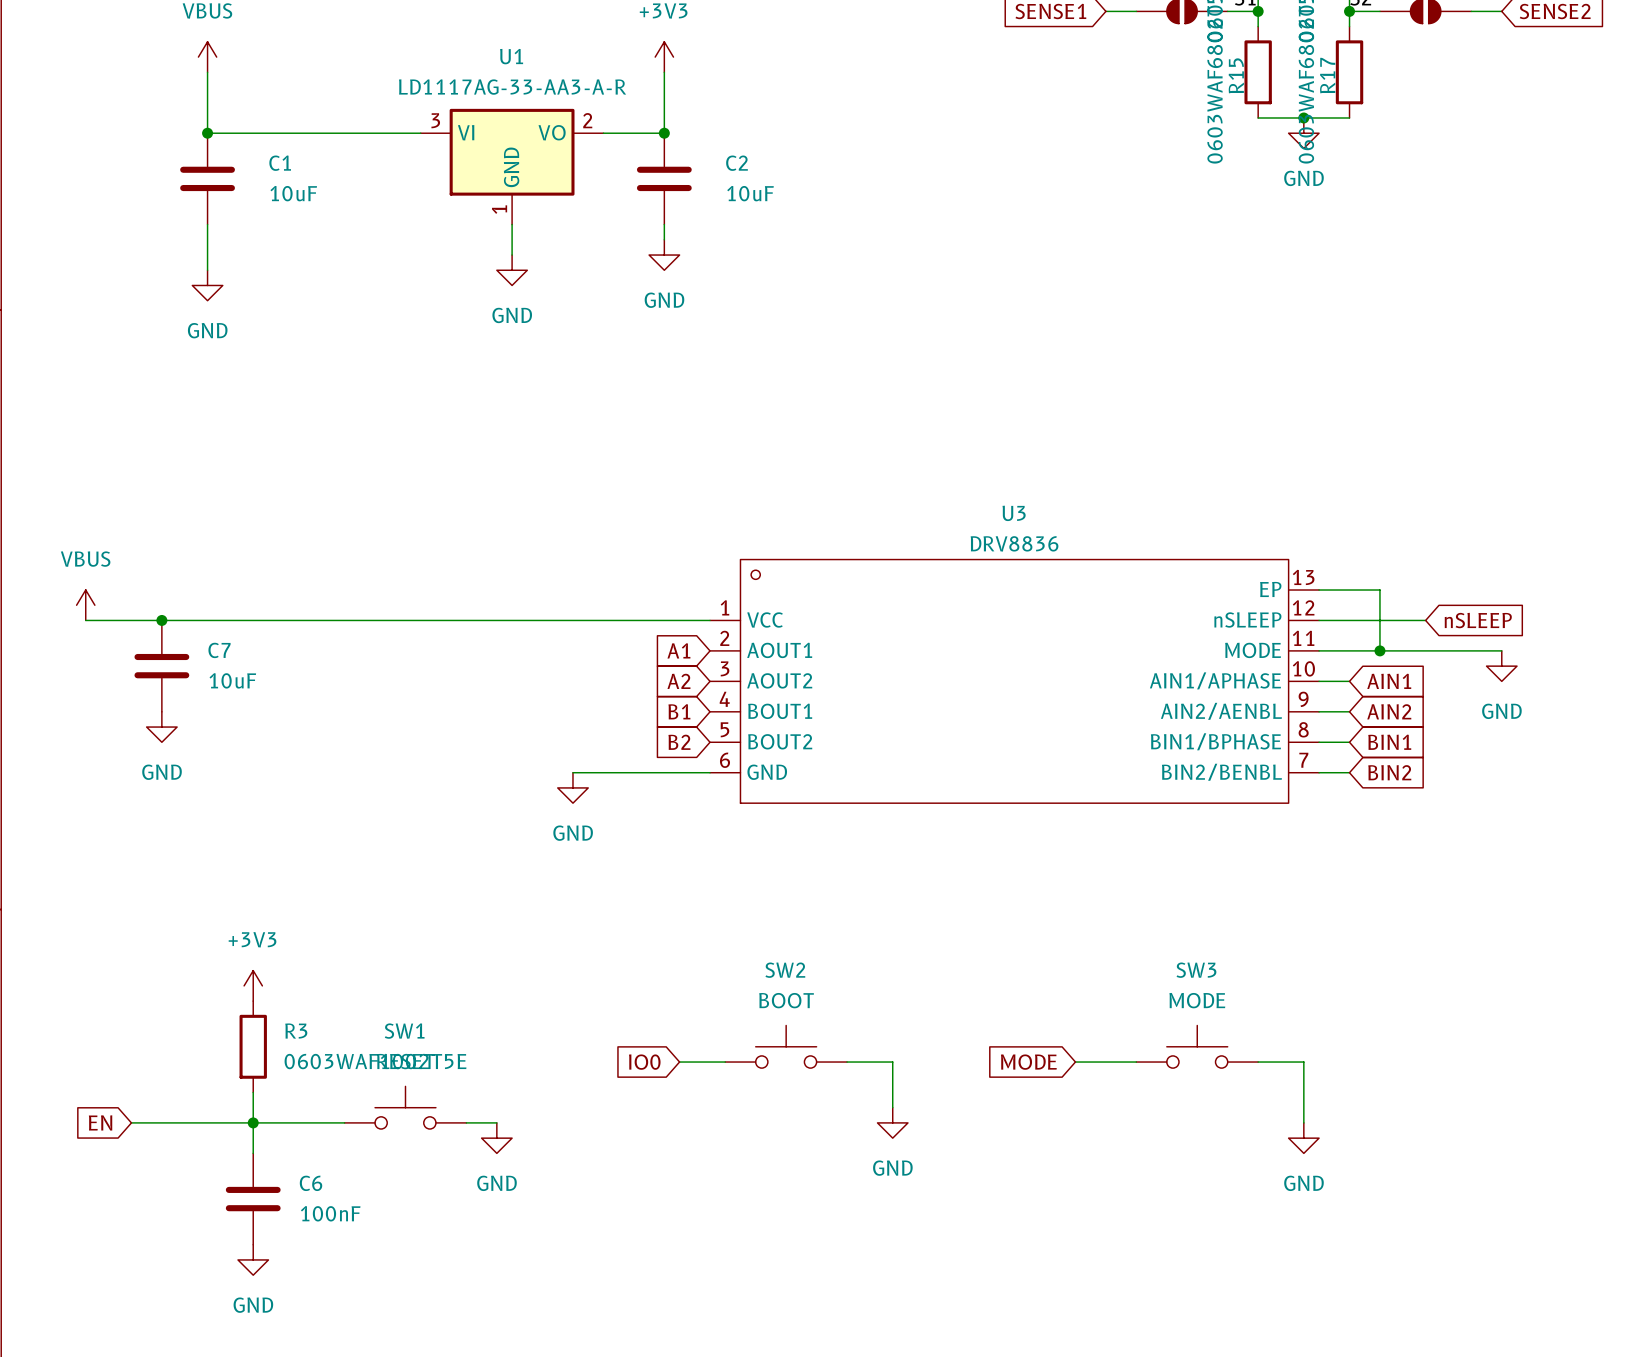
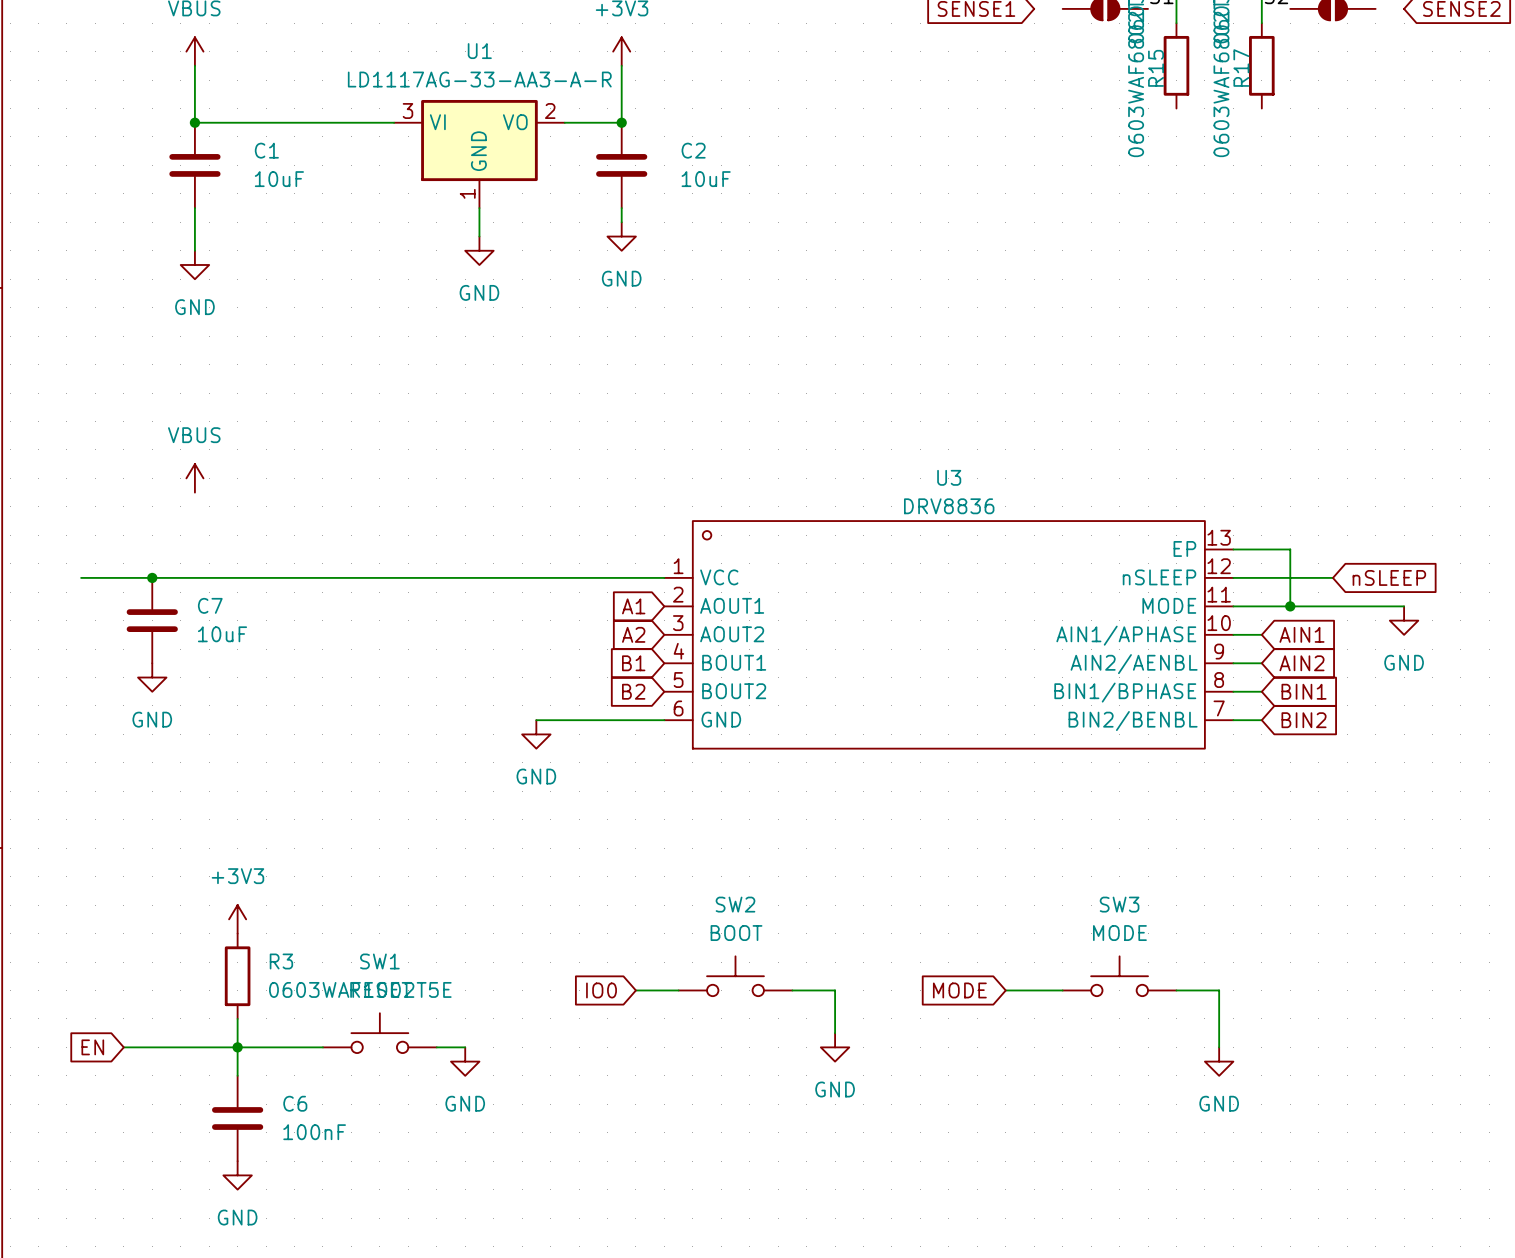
wire: (1105, 11) (1136, 11) -> none
wire: (1227, 11) (1258, 11) -> none
junction: (1258, 11) -> none
wire: (1349, 11) (1379, 11) -> none
junction: (1349, 11) -> none
wire: (1471, 11) (1501, 11) -> none
wire: (1258, 117) (1349, 117) -> none
junction: (1303, 117) -> none
power symbol: GND (1303, 133) -> none
power symbol position: VBUS (85, 605) -> VBUS (194, 478)

